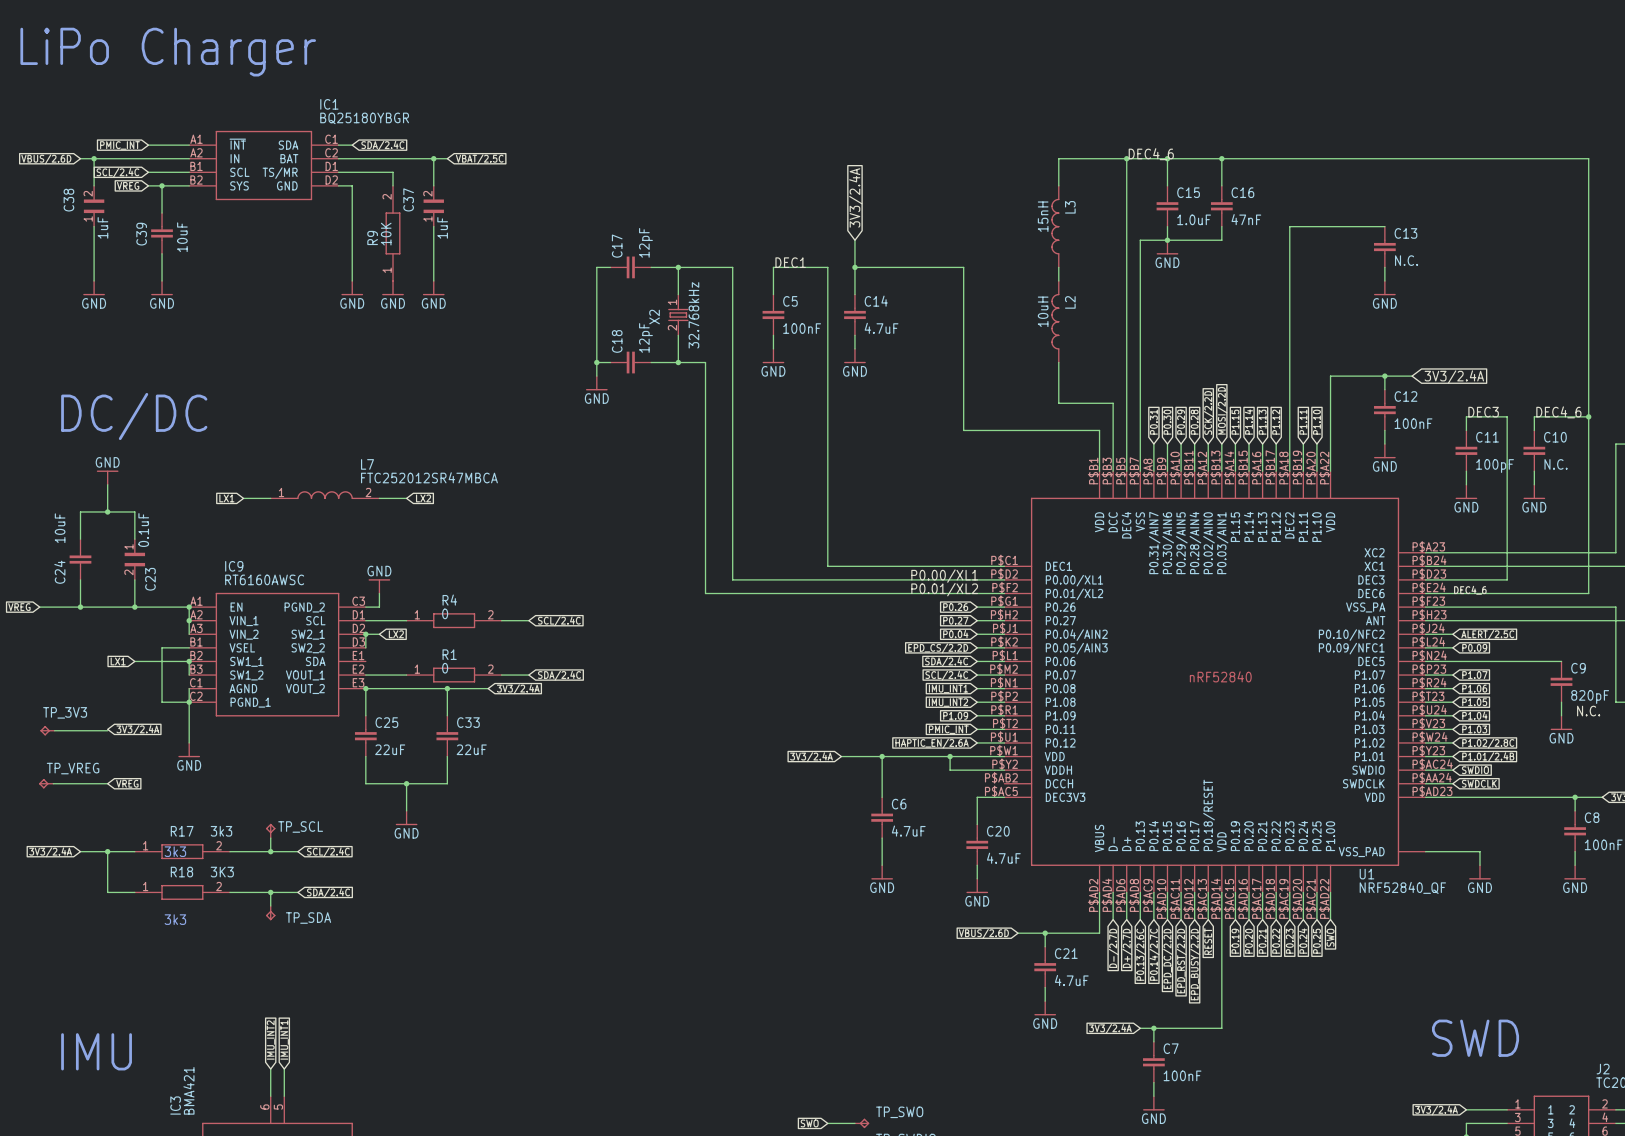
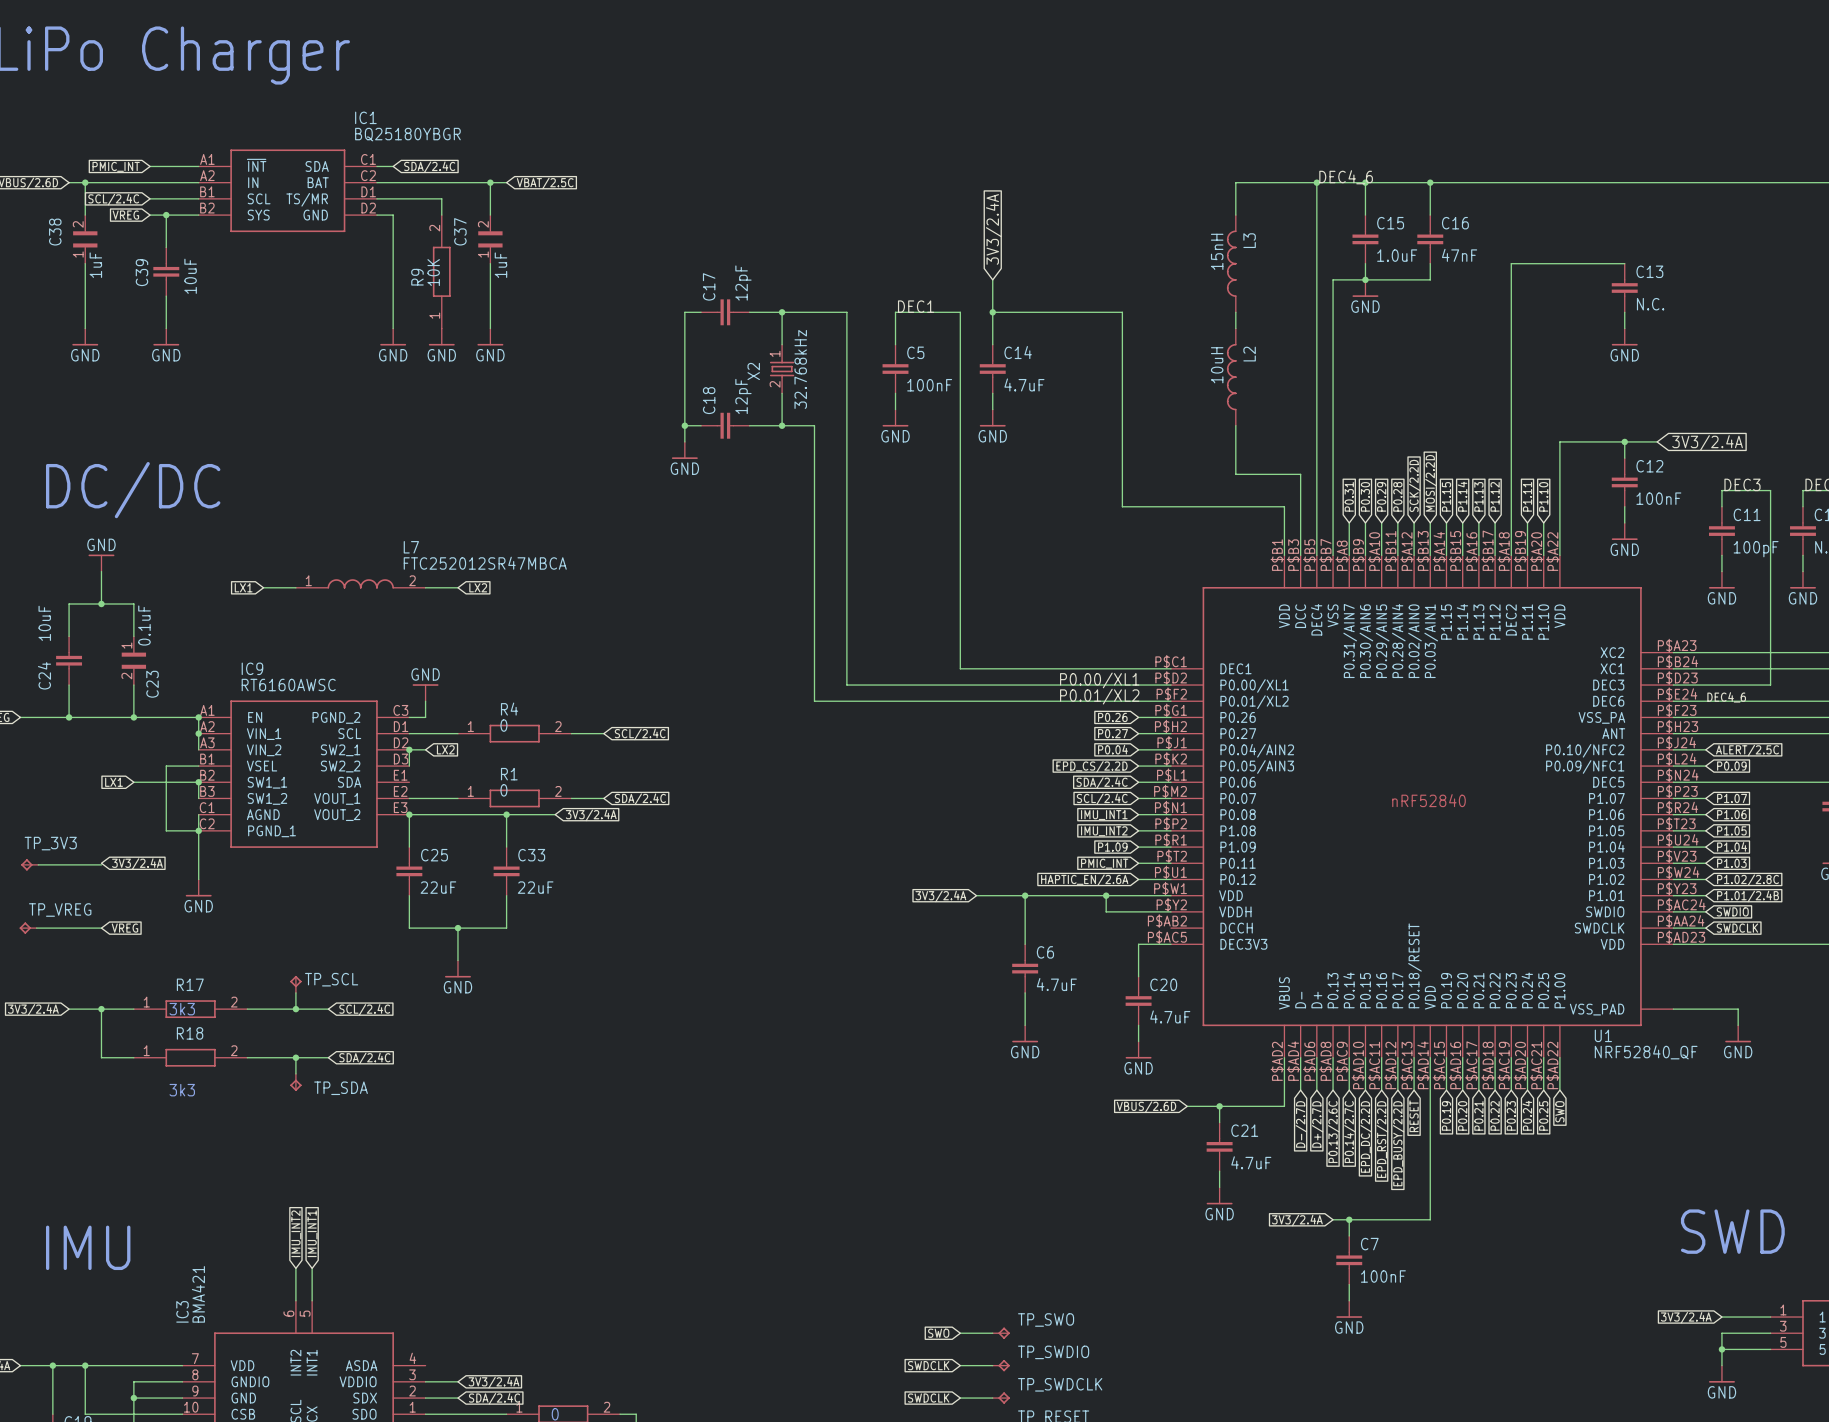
R17 value: 3k3 (221, 831) -> none
R18 value: 3K3 (222, 872) -> none

